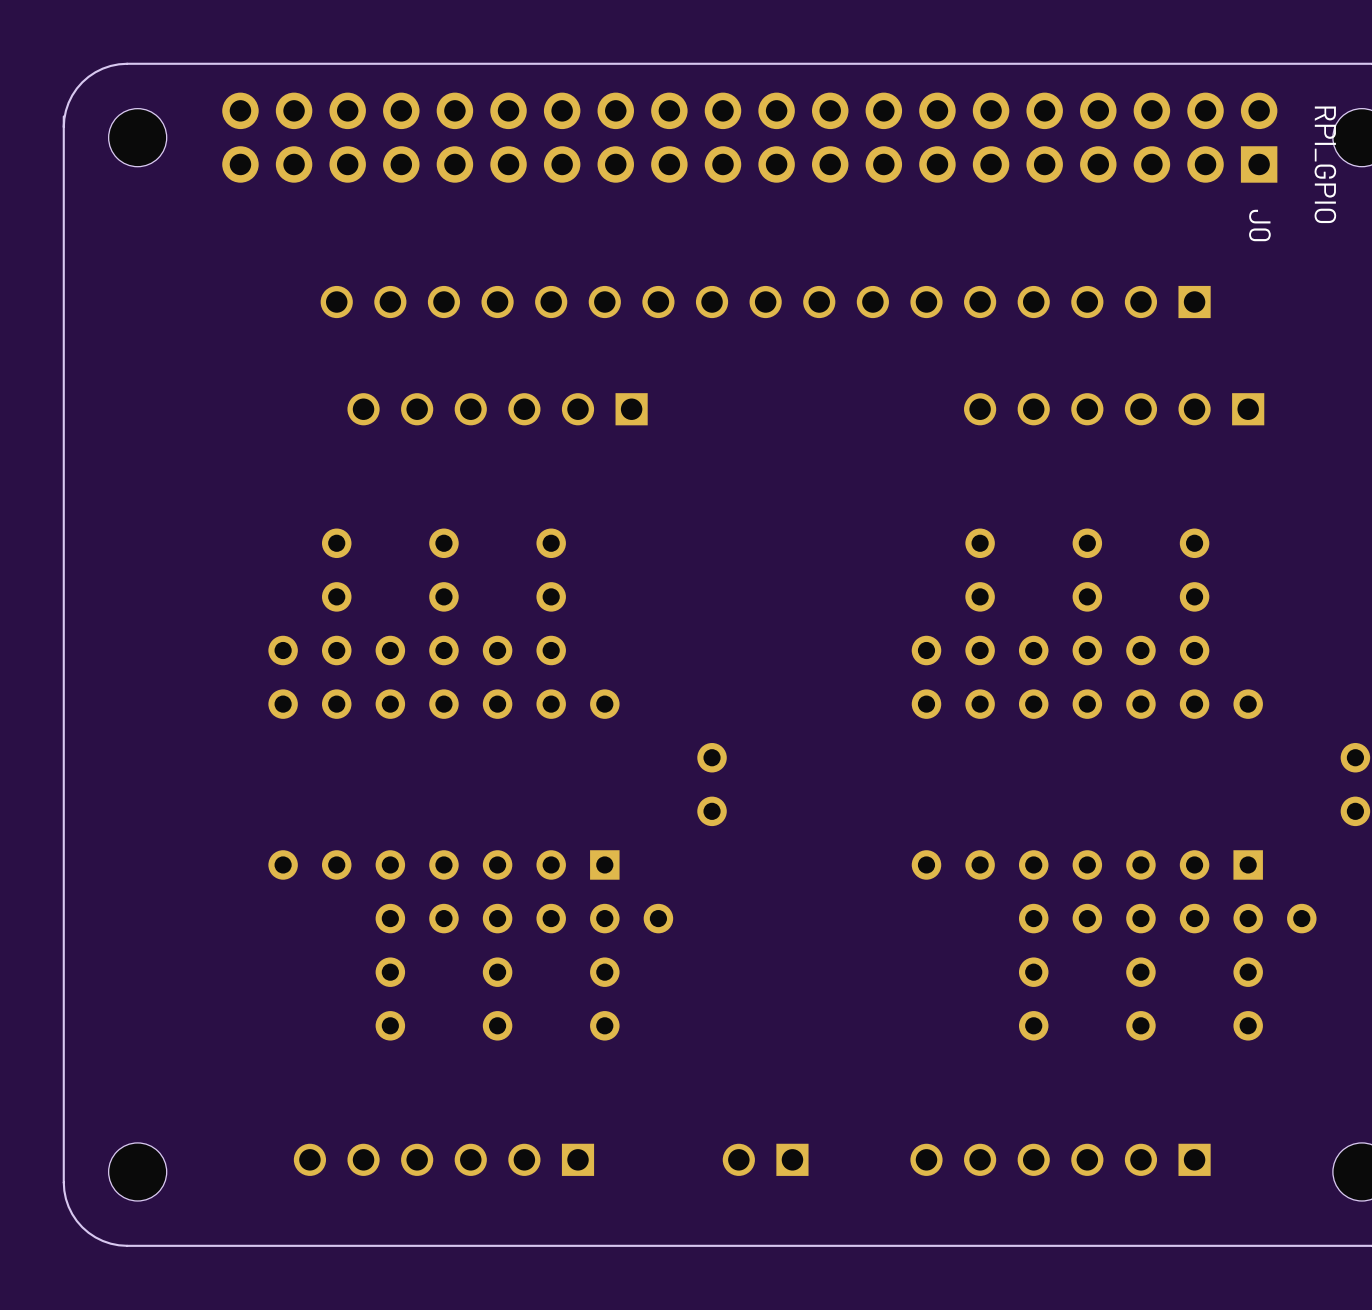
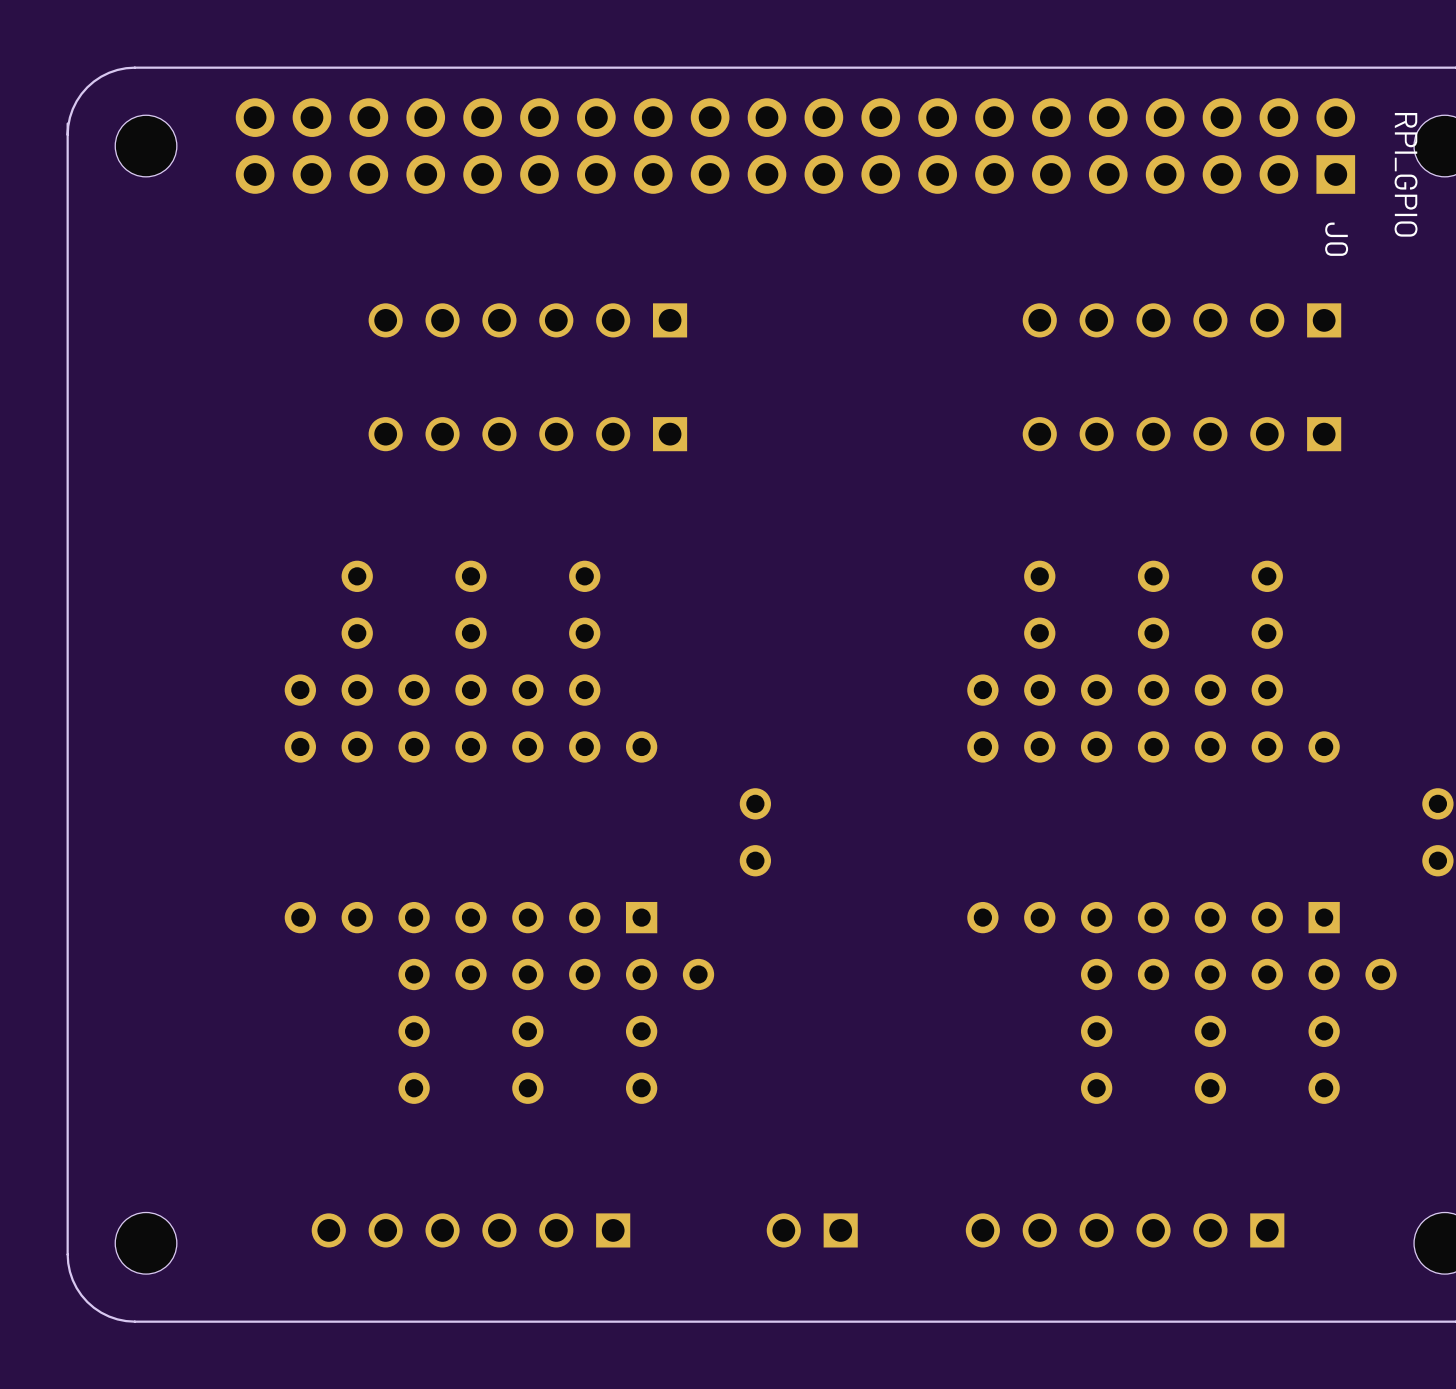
part: none -> (527, 320)
part: (765, 302) -> none
part: none -> (1181, 320)

